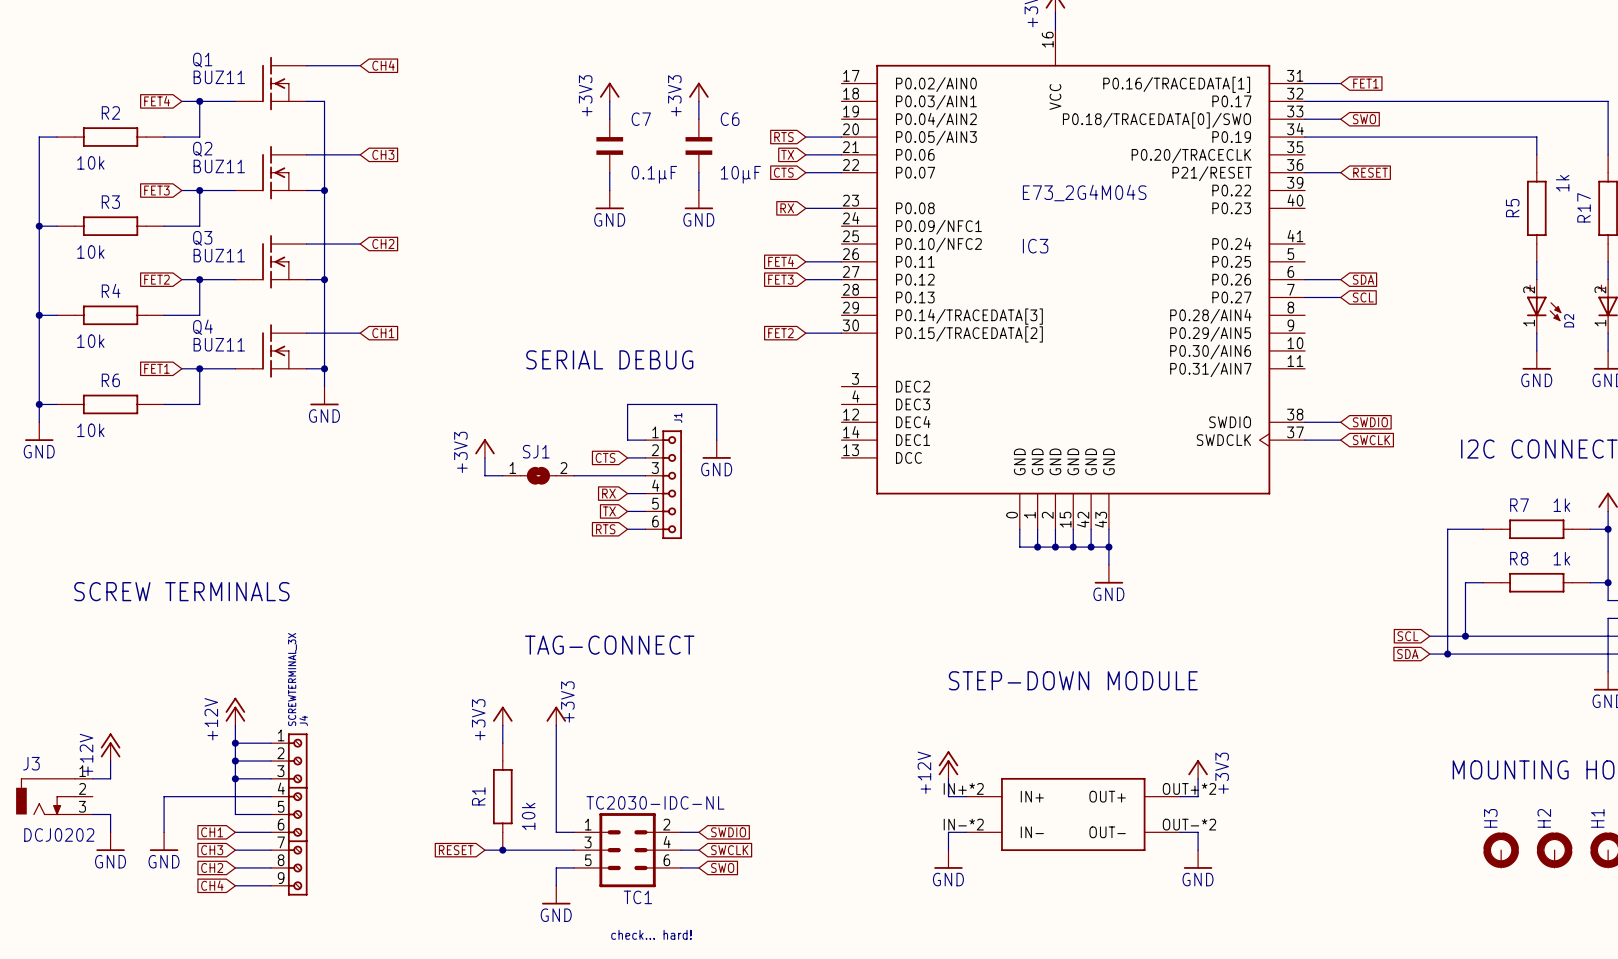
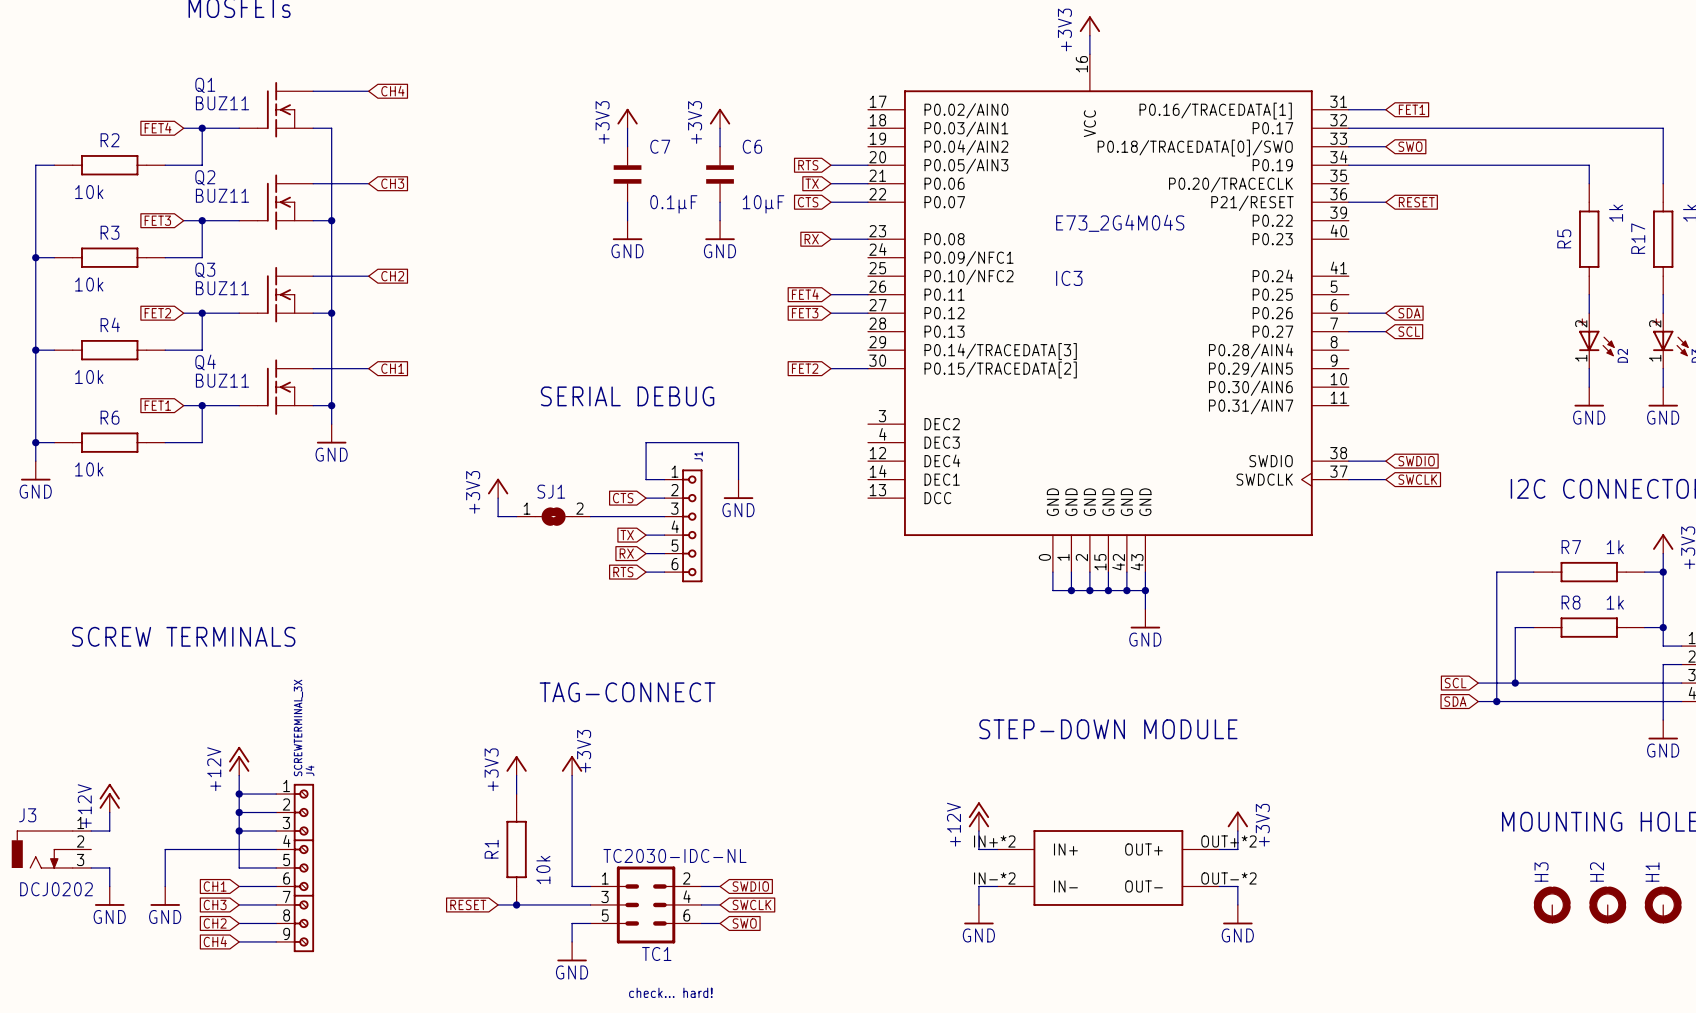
global label: RX (608, 493) -> TX (627, 535)
global label: TX (609, 511) -> RX (626, 553)

